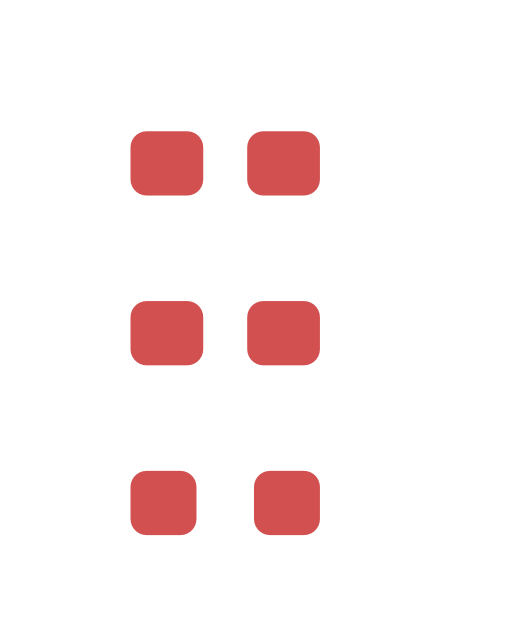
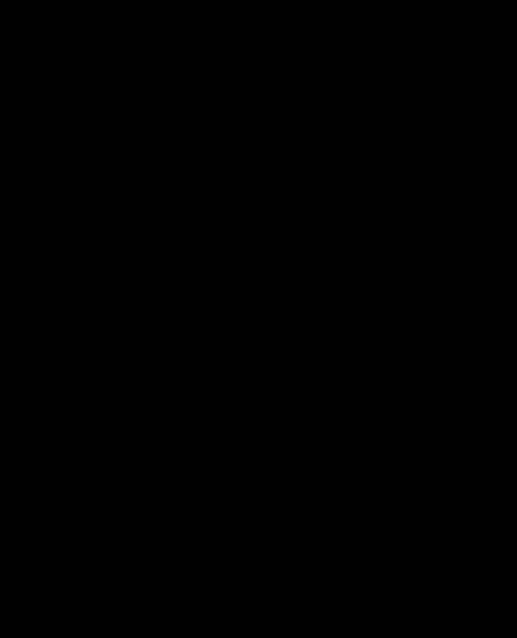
part: (225, 163) -> none
part: (225, 333) -> none
part: (225, 502) -> none

